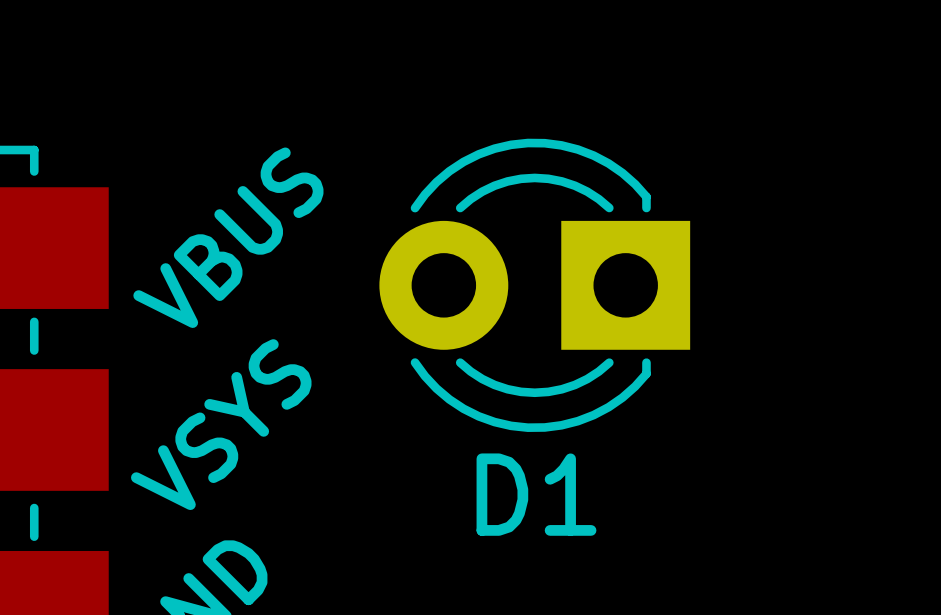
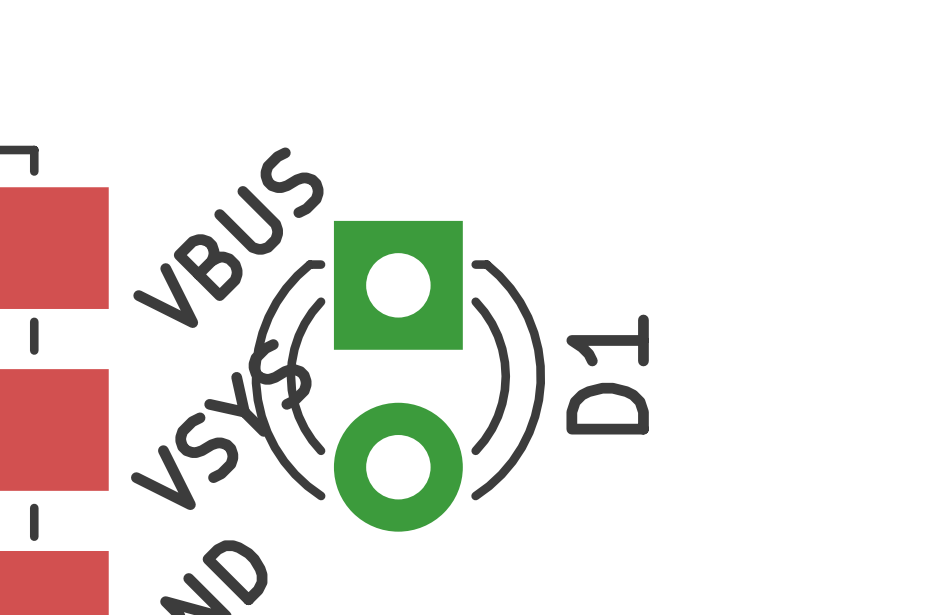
D1 rotation: 0° (534, 285) -> 90° counterclockwise (398, 376)

